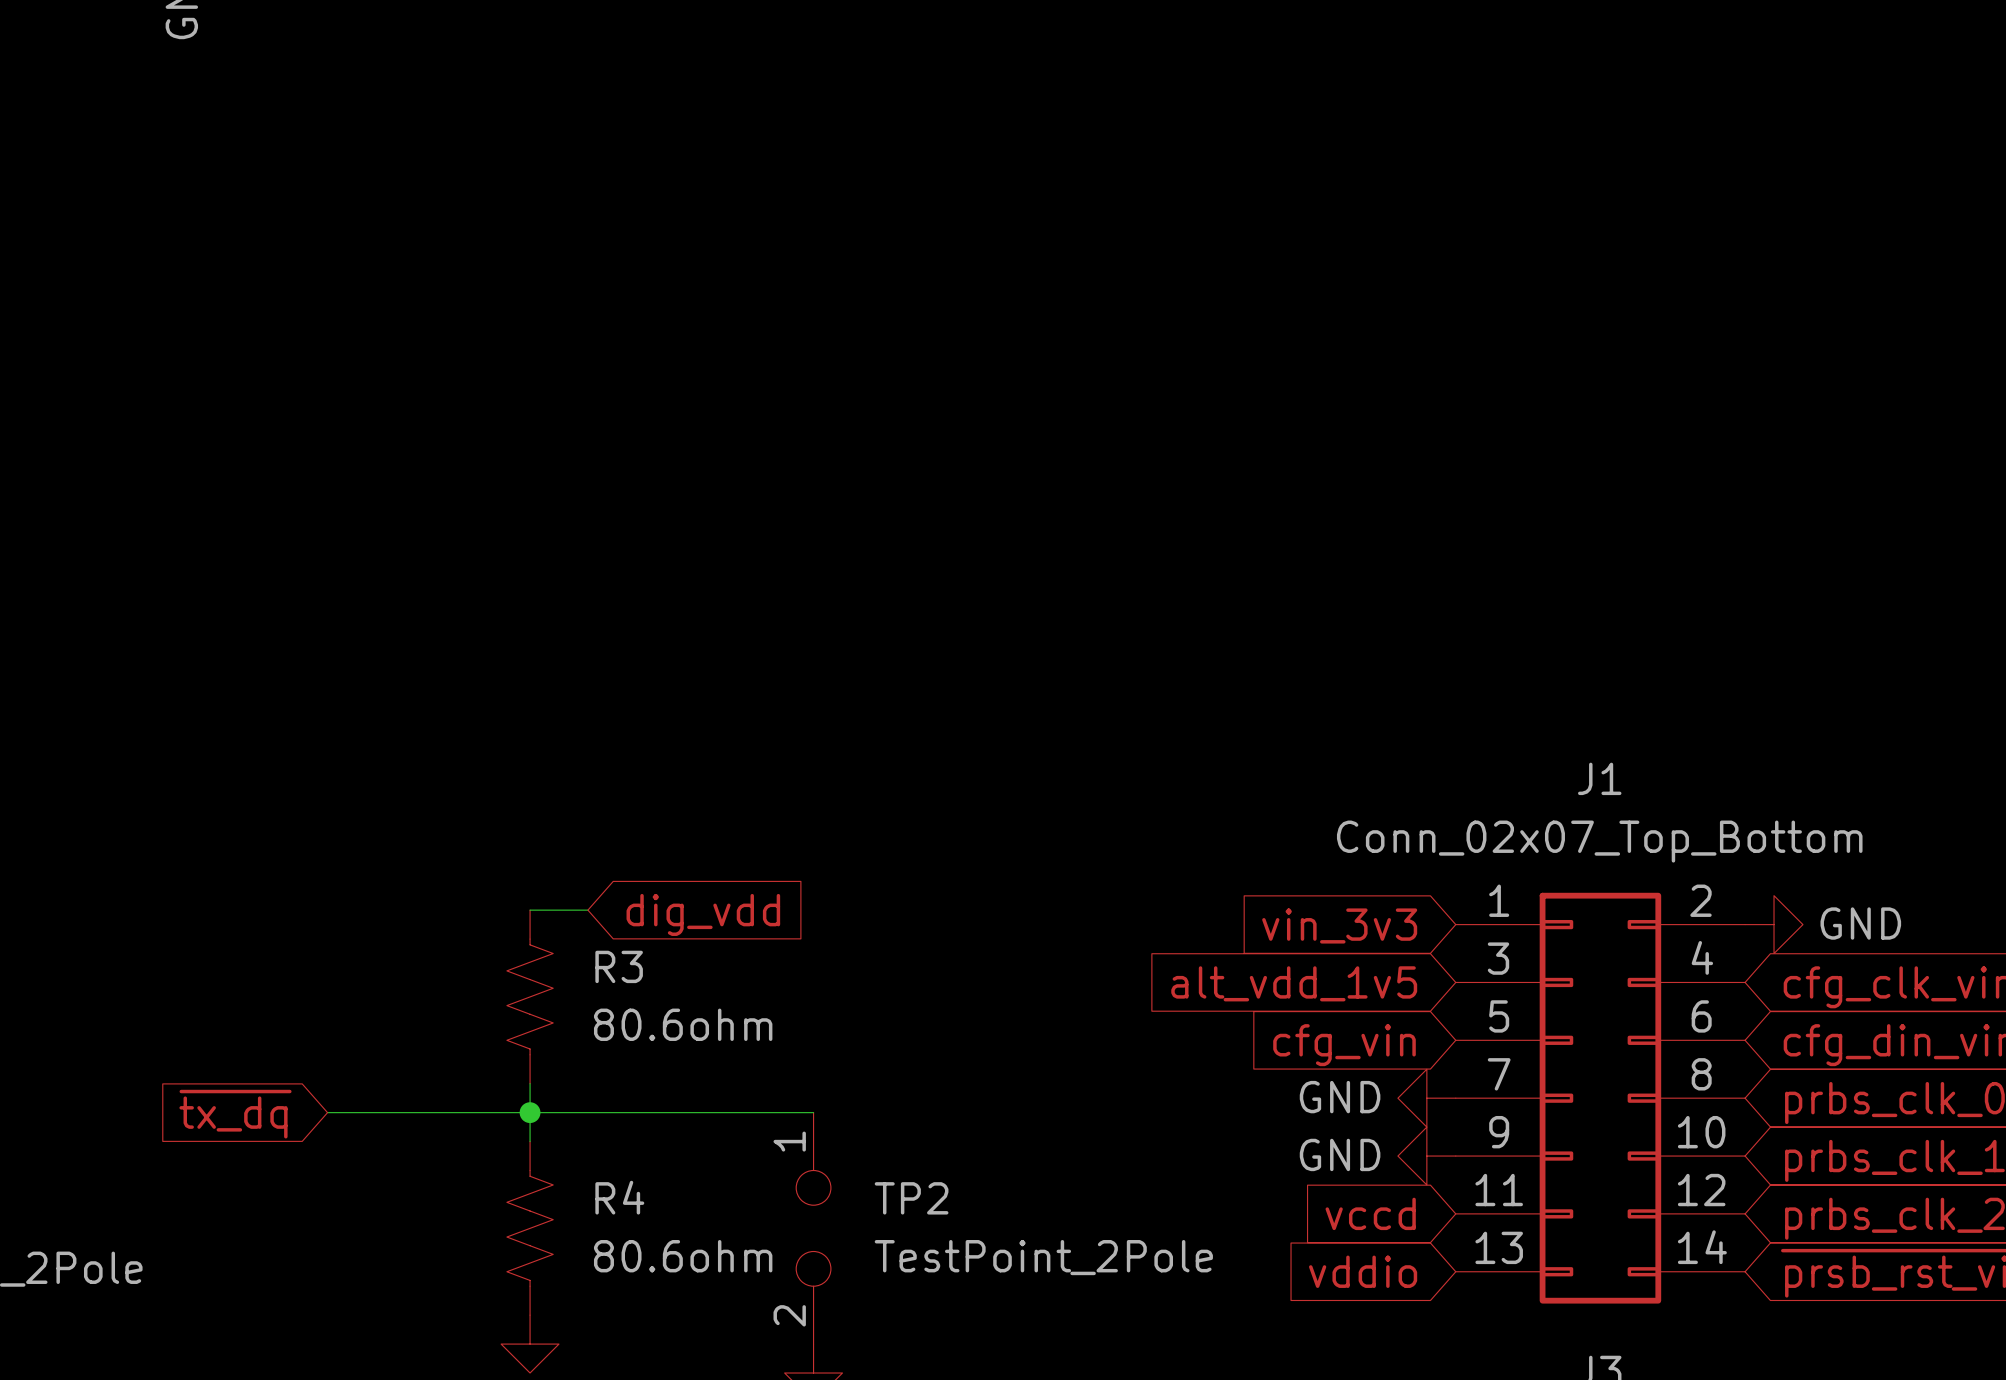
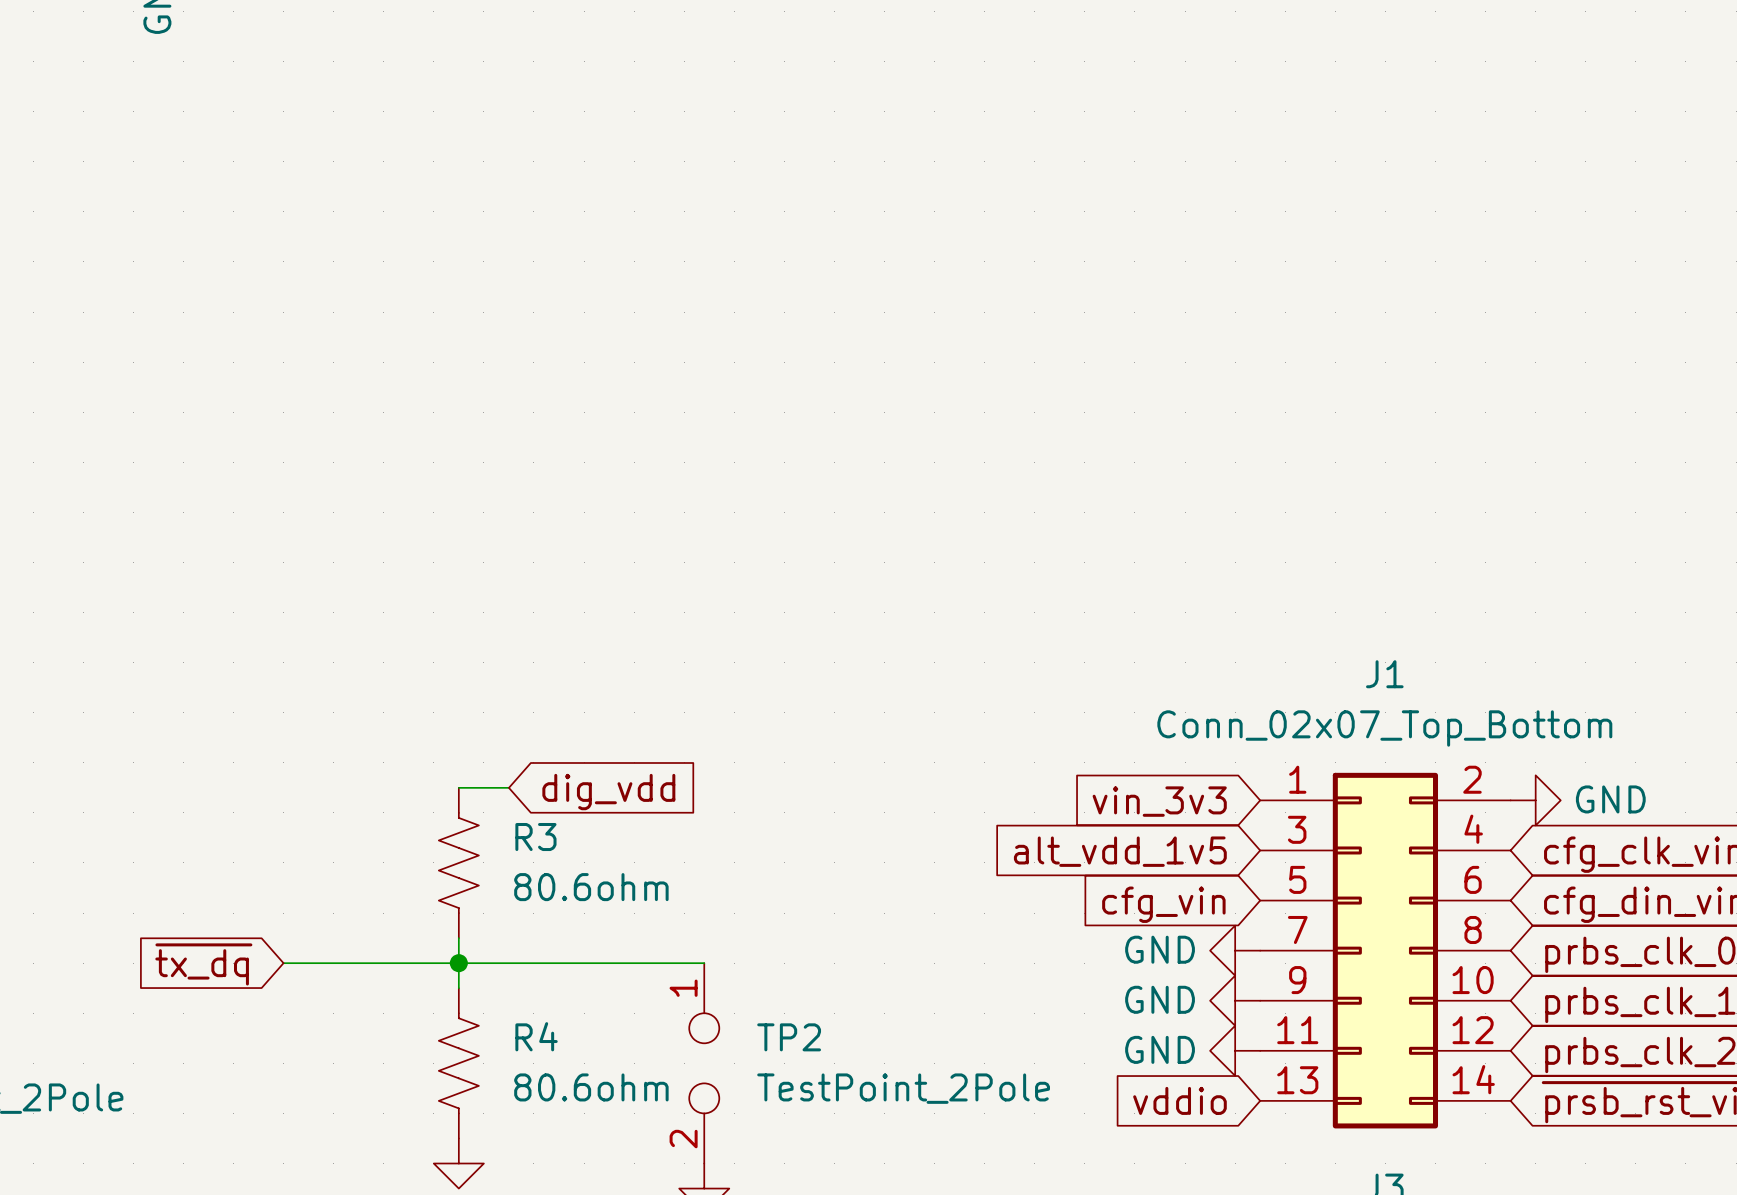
global label: vccd (1370, 1213) -> none
power symbol: none -> GND (1235, 1050)

